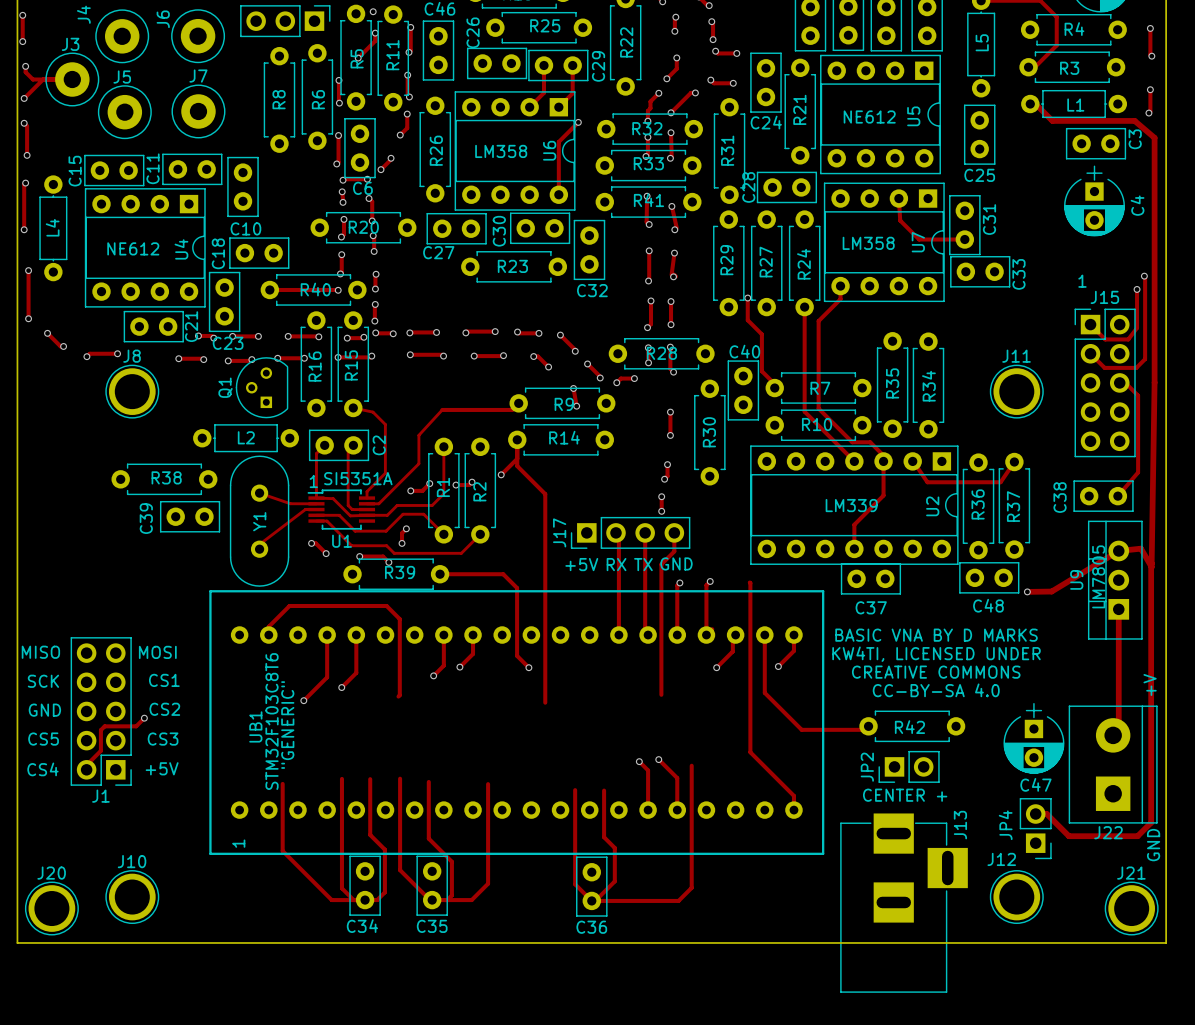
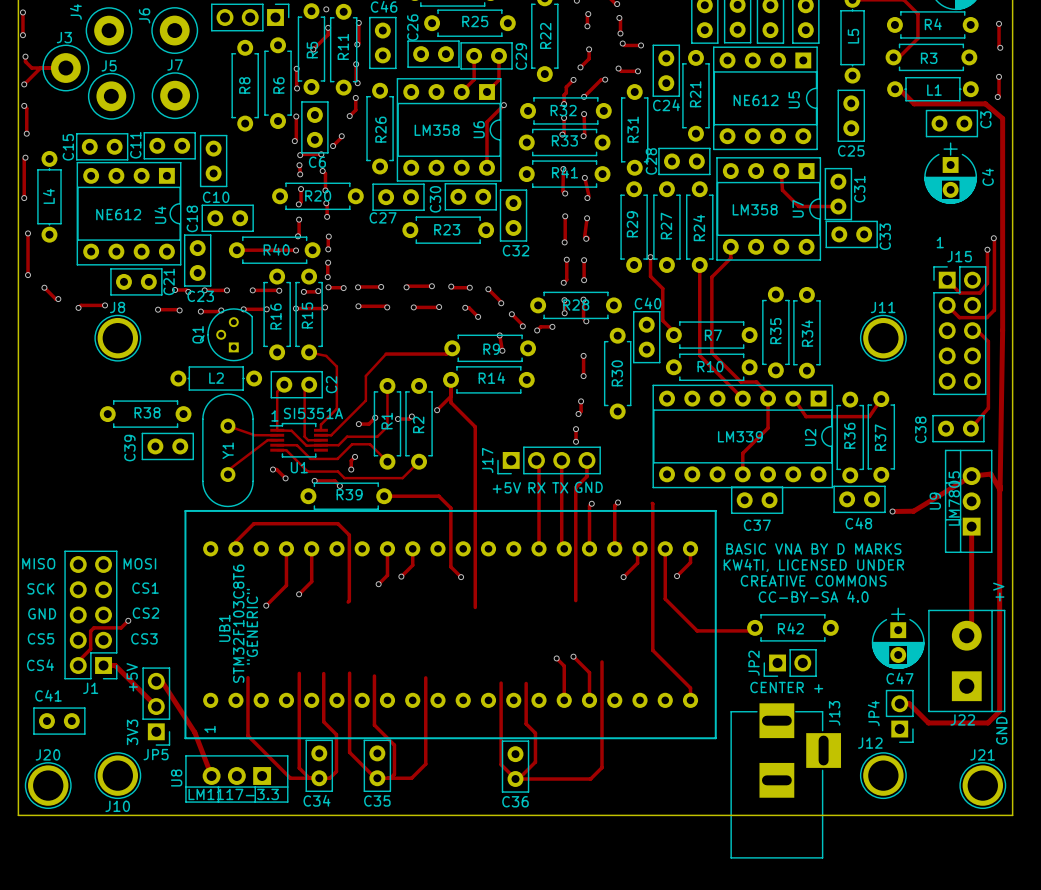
text rotation: 0° (162, 768) -> 90° counterclockwise (132, 677)
track: none -> (103, 665) (115, 665) (156, 706)
track: none -> (156, 681) (161, 681) (194, 732) (211, 775)
JP5: none -> (156, 706)
C41: none -> (59, 721)
text: none -> 3V3 (132, 732)
J10 name position: J10 (132, 861) -> J10 (117, 806)
U8: none -> (236, 778)
text: none -> LM1117-3.3 (233, 794)

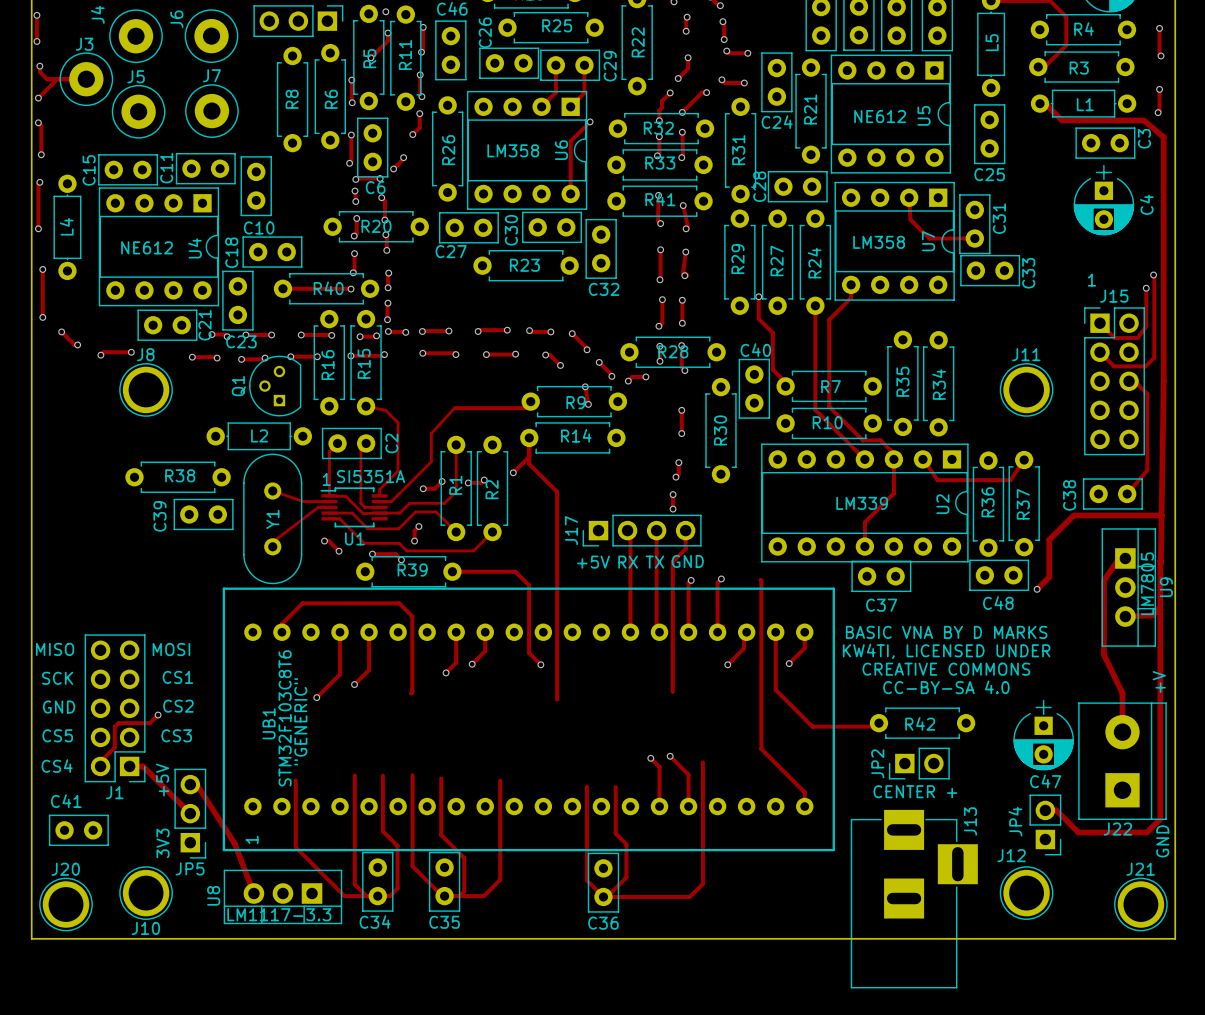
track: none -> (1125, 558) (1119, 558) (1103, 580) (1103, 654) (1122, 693) (1122, 732)
track: (1000, 490) (990, 474) (971, 476) (913, 511) (892, 511) -> (1161, 515) (1073, 515) (1049, 539) (1049, 577) (1037, 589)
text position: LM7805 (954, 498) -> LM7805 (1147, 583)
U9 rotation: 0° (968, 501) -> 180° (1128, 587)
track: (971, 526) (971, 630) -> none
track: none -> (1160, 607) (1152, 615) (1125, 616)

